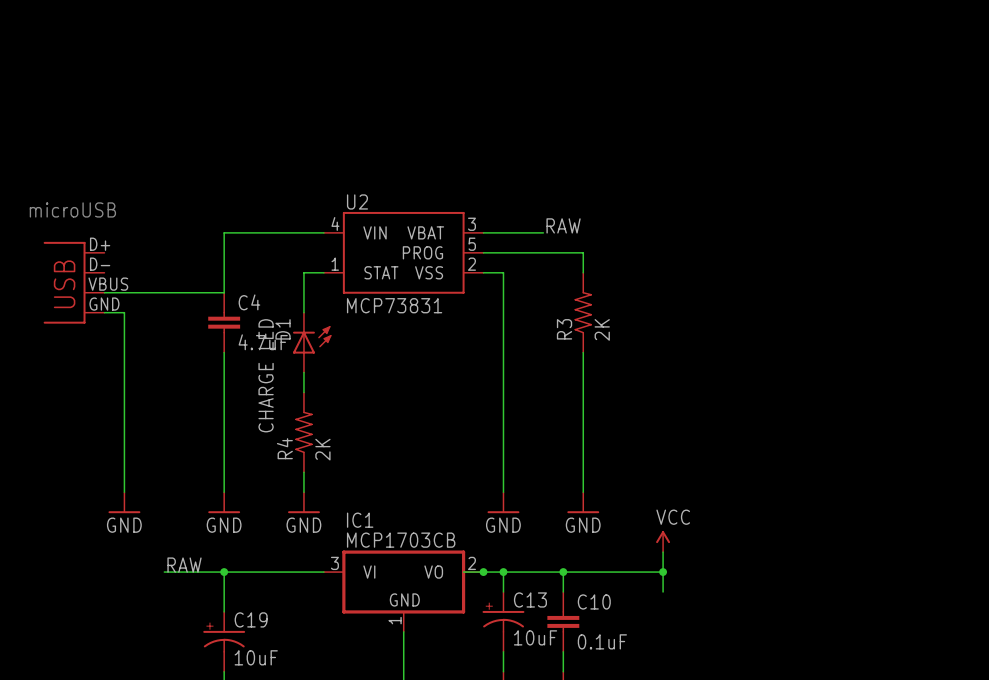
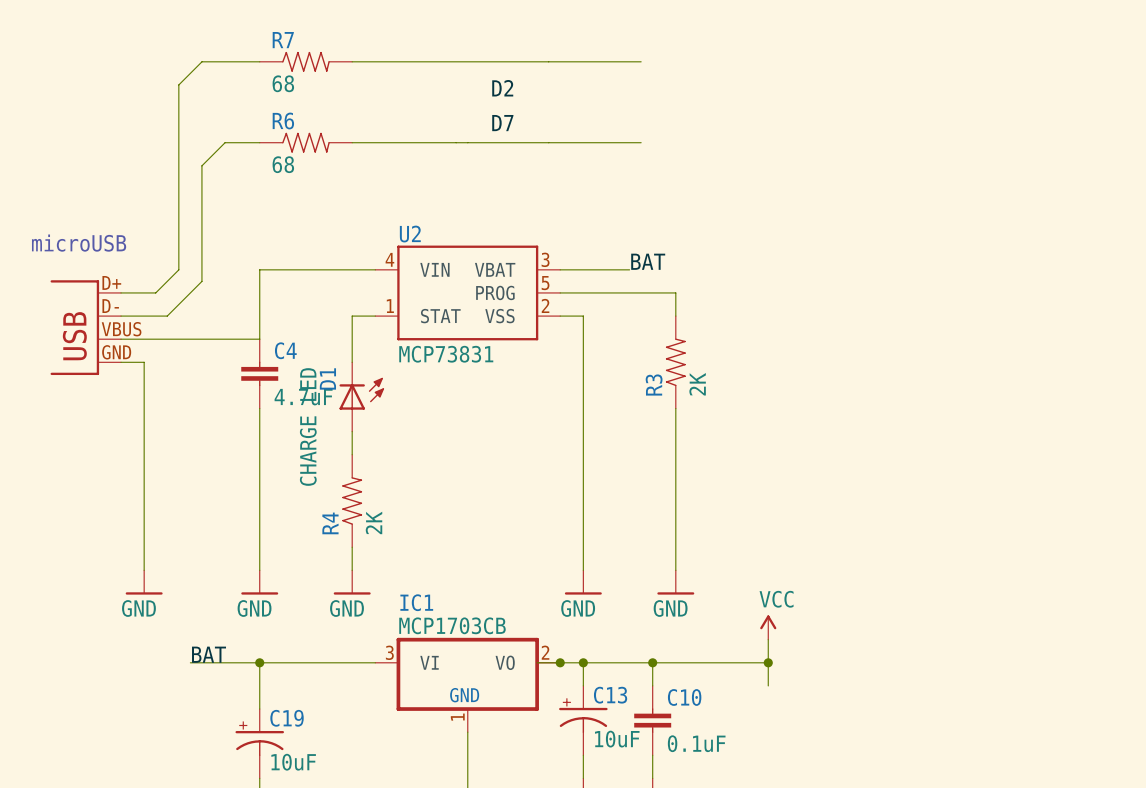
wire: none -> (259, 61) (201, 61) (178, 84) (178, 269) (155, 292) (121, 292)
R7: none -> 68 (305, 61)
wire: none -> (352, 61) (641, 61)
label: none -> D2 (502, 88)
label: none -> D7 (502, 123)
wire: none -> (259, 142) (225, 142) (201, 165) (201, 281) (167, 316) (121, 316)
R6: none -> 68 (305, 142)
wire: none -> (352, 142) (641, 142)
label: RAW (563, 225) -> BAT (648, 261)
label: RAW (184, 565) -> BAT (209, 654)

